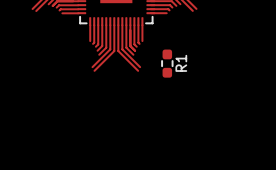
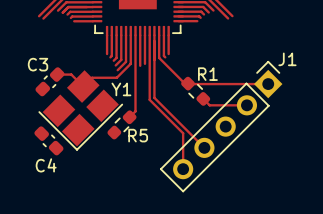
track: (130, 46) (135, 50) -> (154, 59) (154, 97) (204, 147)
track: none -> (161, 60) (184, 83) (268, 84)
track: (126, 47) (133, 54) -> (149, 61) (149, 99) (183, 133) (183, 169)
track: (122, 49) (140, 67) -> none
track: (114, 51) (94, 70) -> (135, 65) (135, 111) (129, 117)
track: (118, 51) (138, 70) -> none
track: (98, 61) (92, 67) -> (116, 77) (92, 77) (83, 86) (71, 74) (57, 74)
R1 rotation: 0° (167, 63) -> 45° counterclockwise (195, 91)
C3: none -> (49, 81)
track: none -> (203, 98) (209, 105) (246, 105)
Y1: none -> (80, 110)
R5: none -> (121, 124)
J1: none -> (221, 126)
C4: none -> (48, 140)

